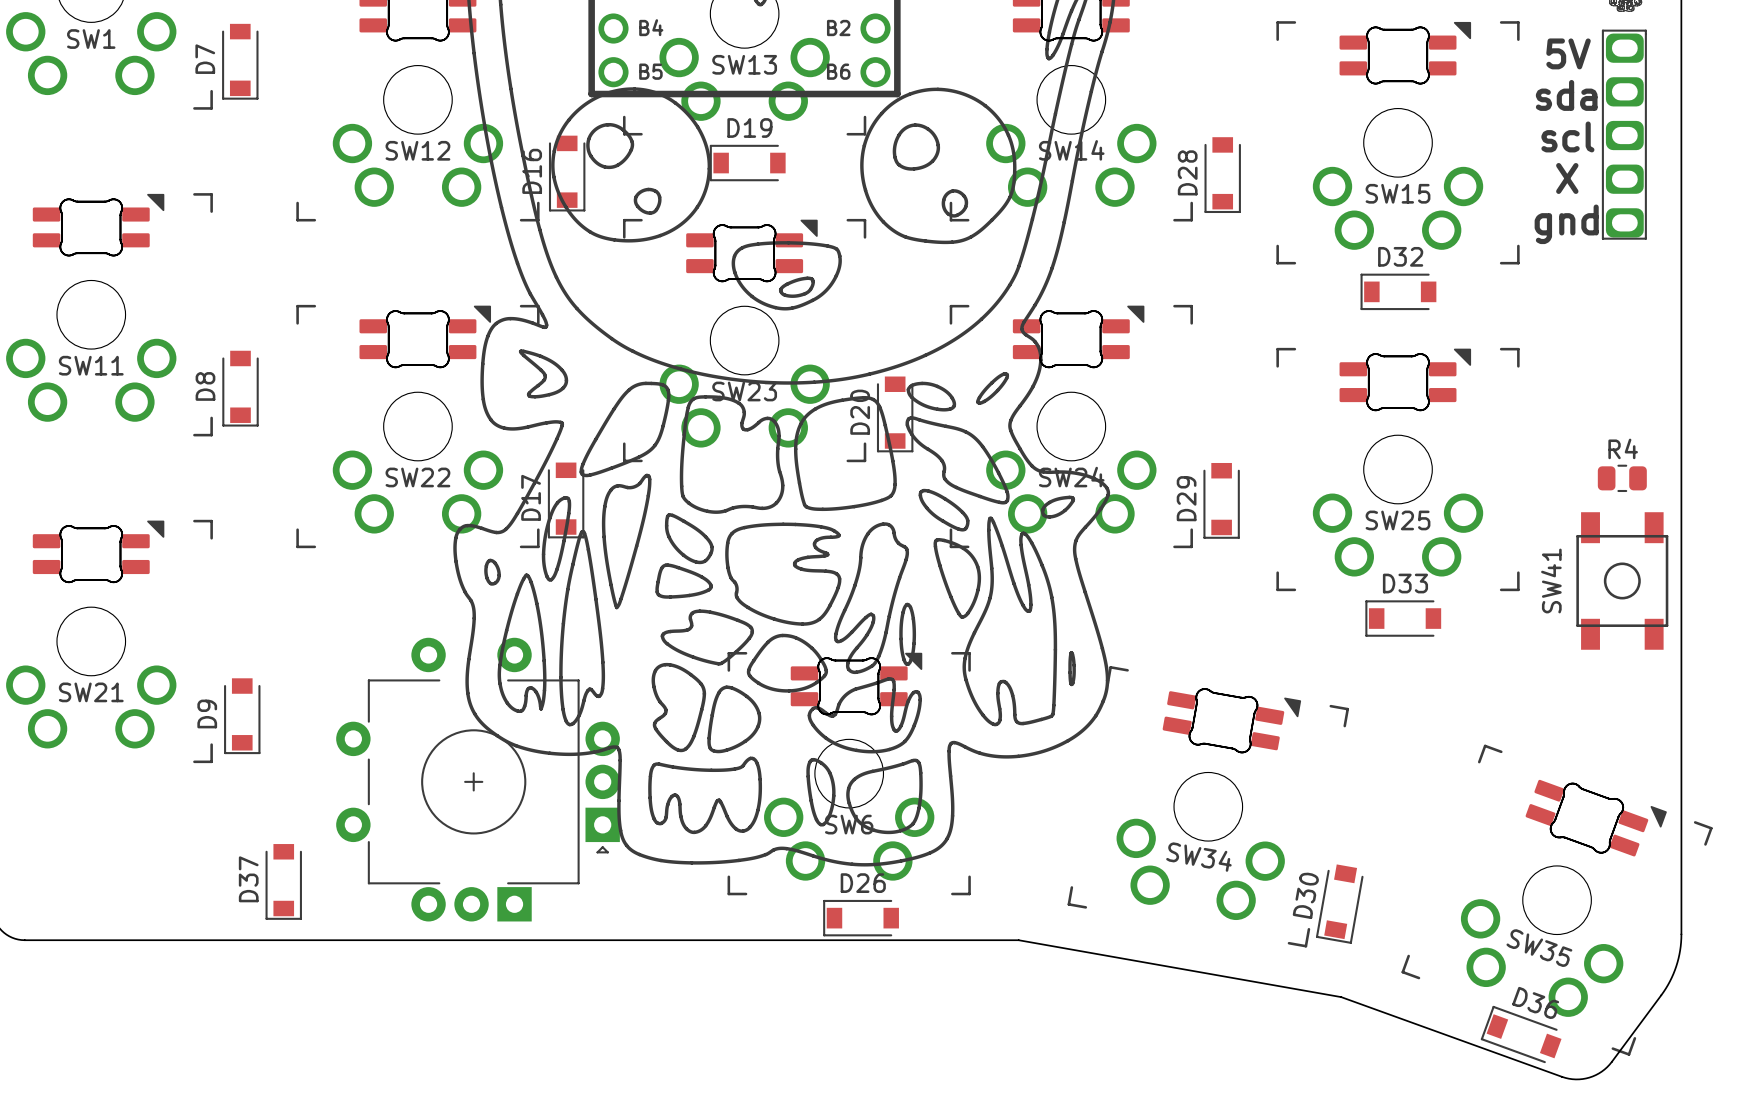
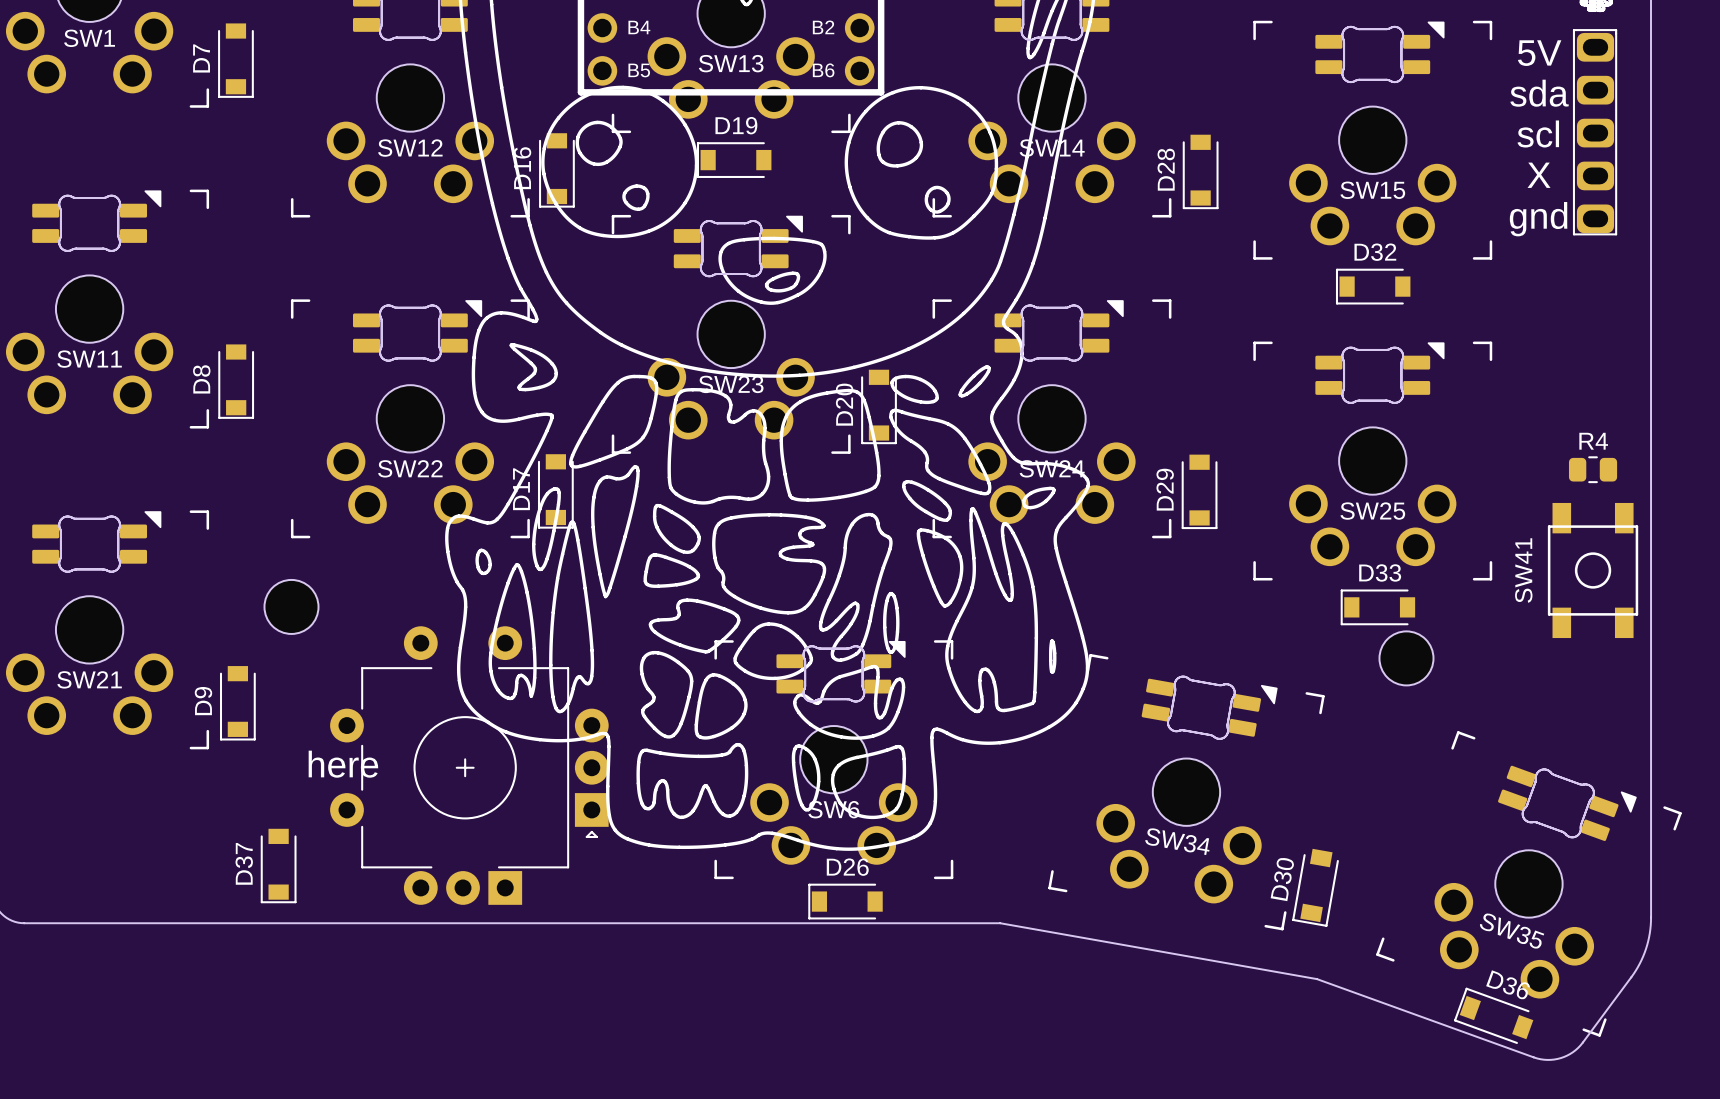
part: none -> (291, 606)
part: none -> (1406, 658)
text: none -> here (343, 764)

